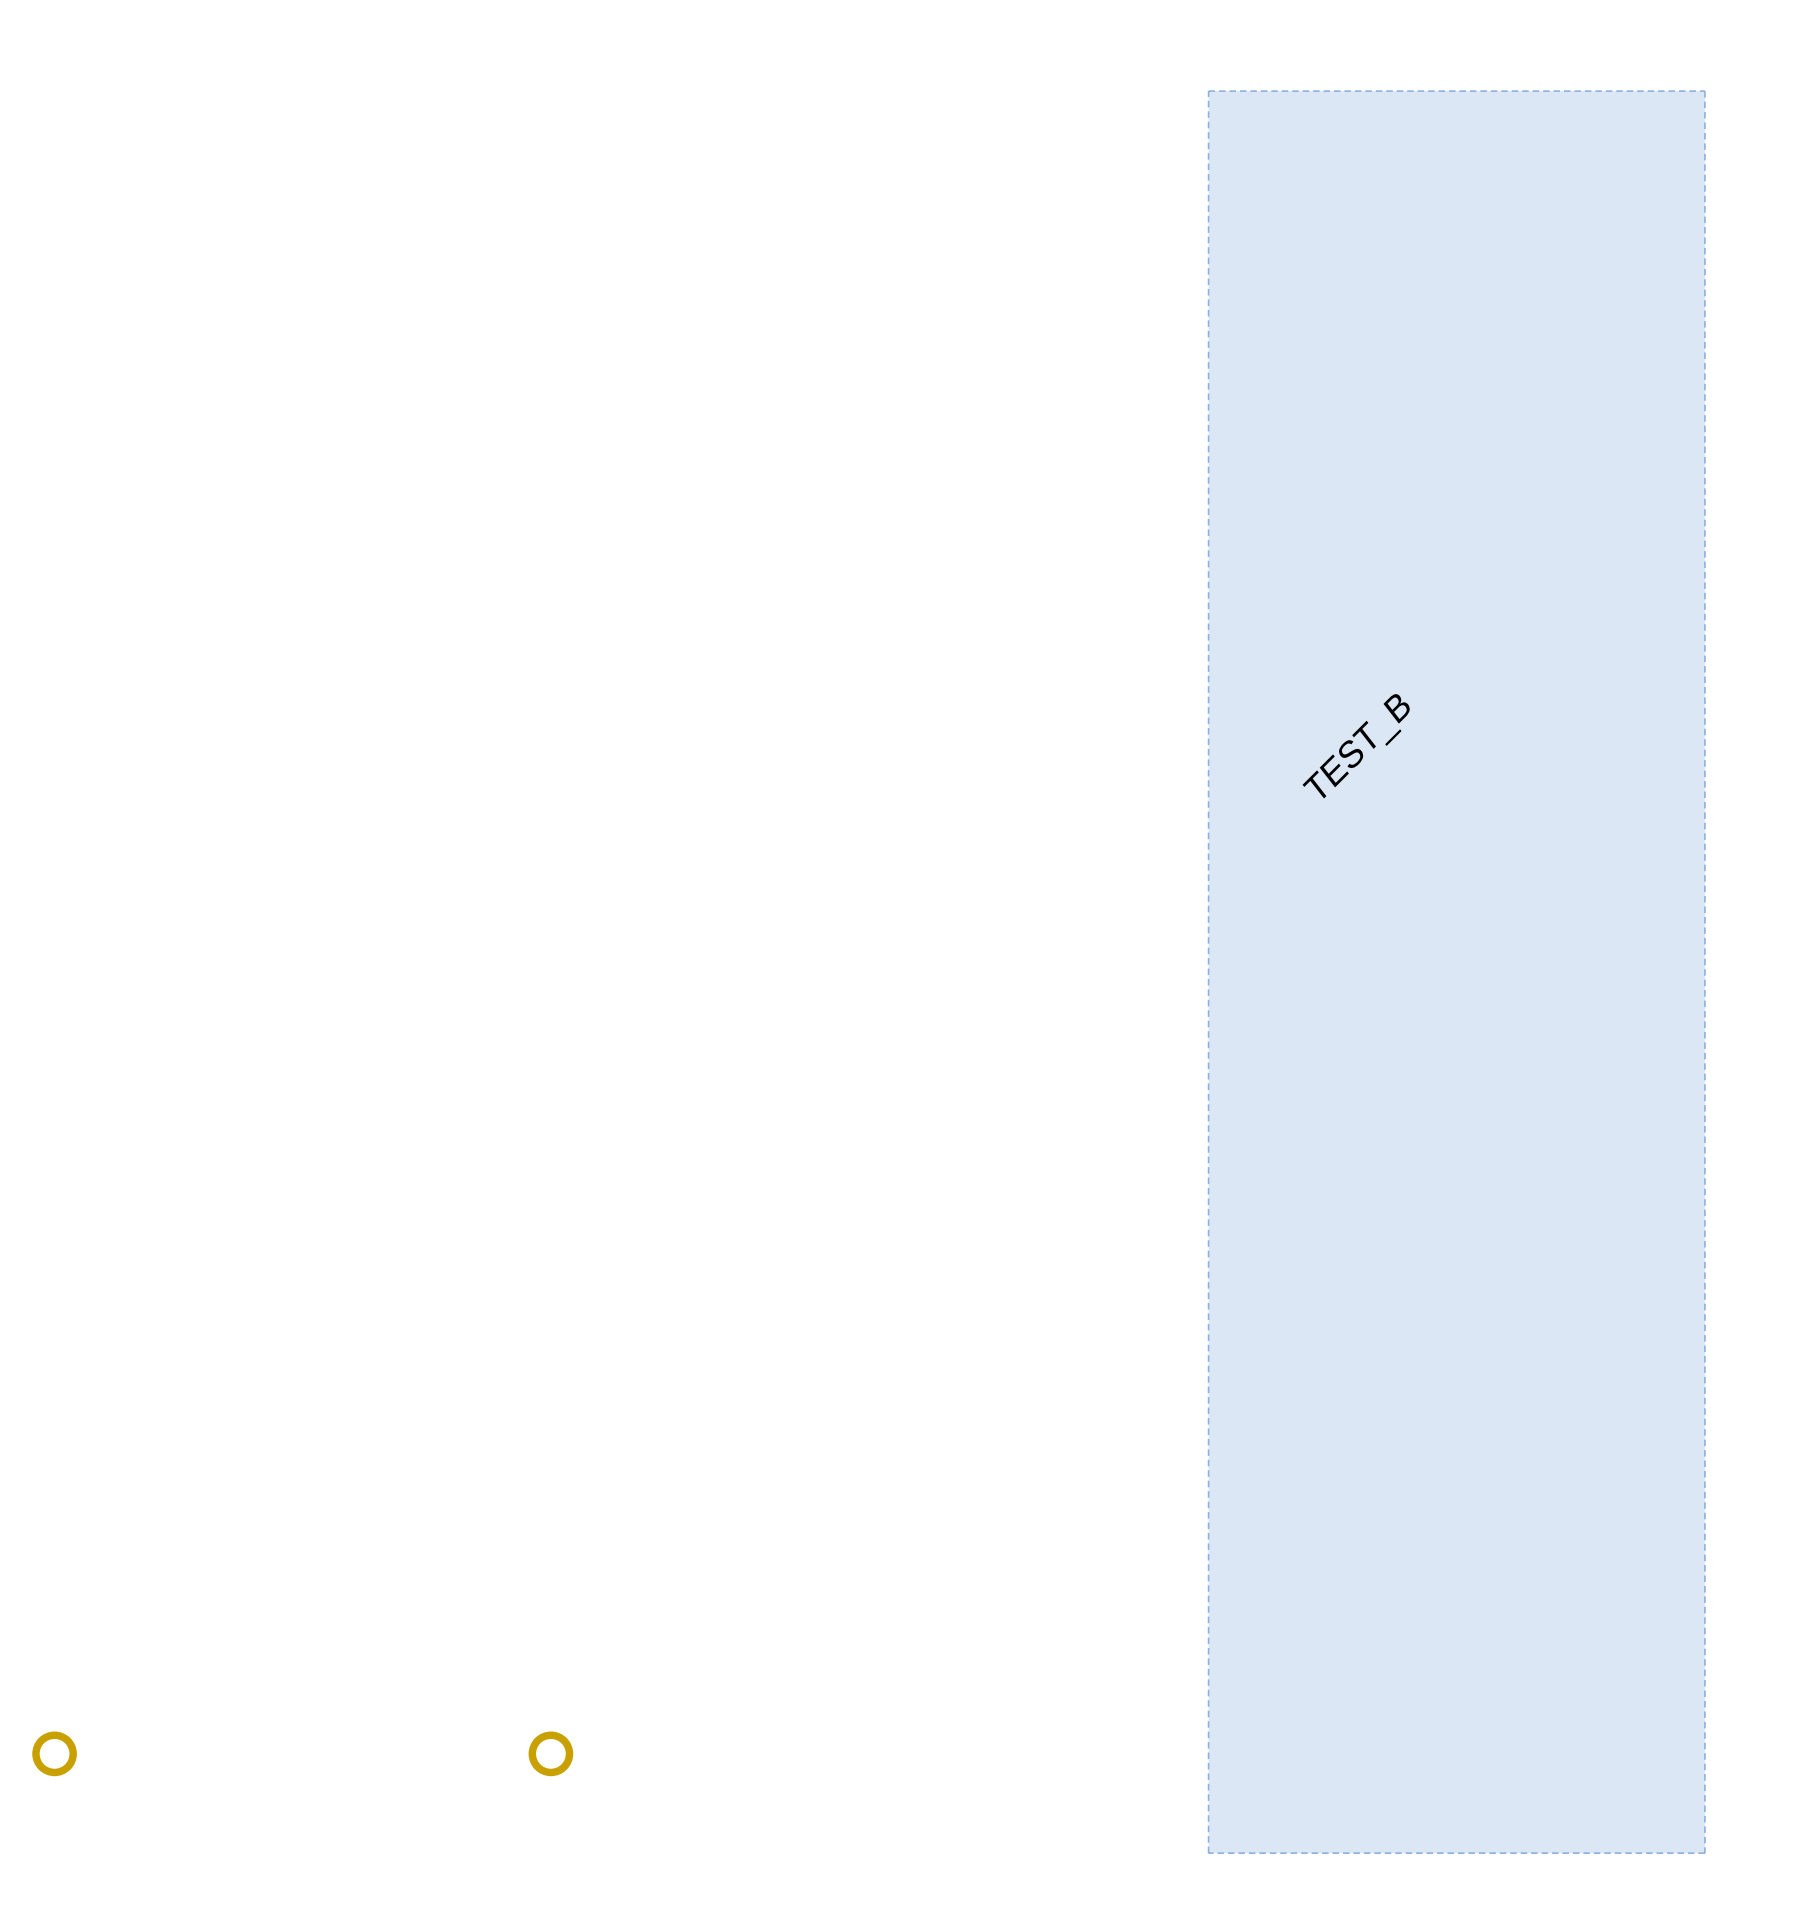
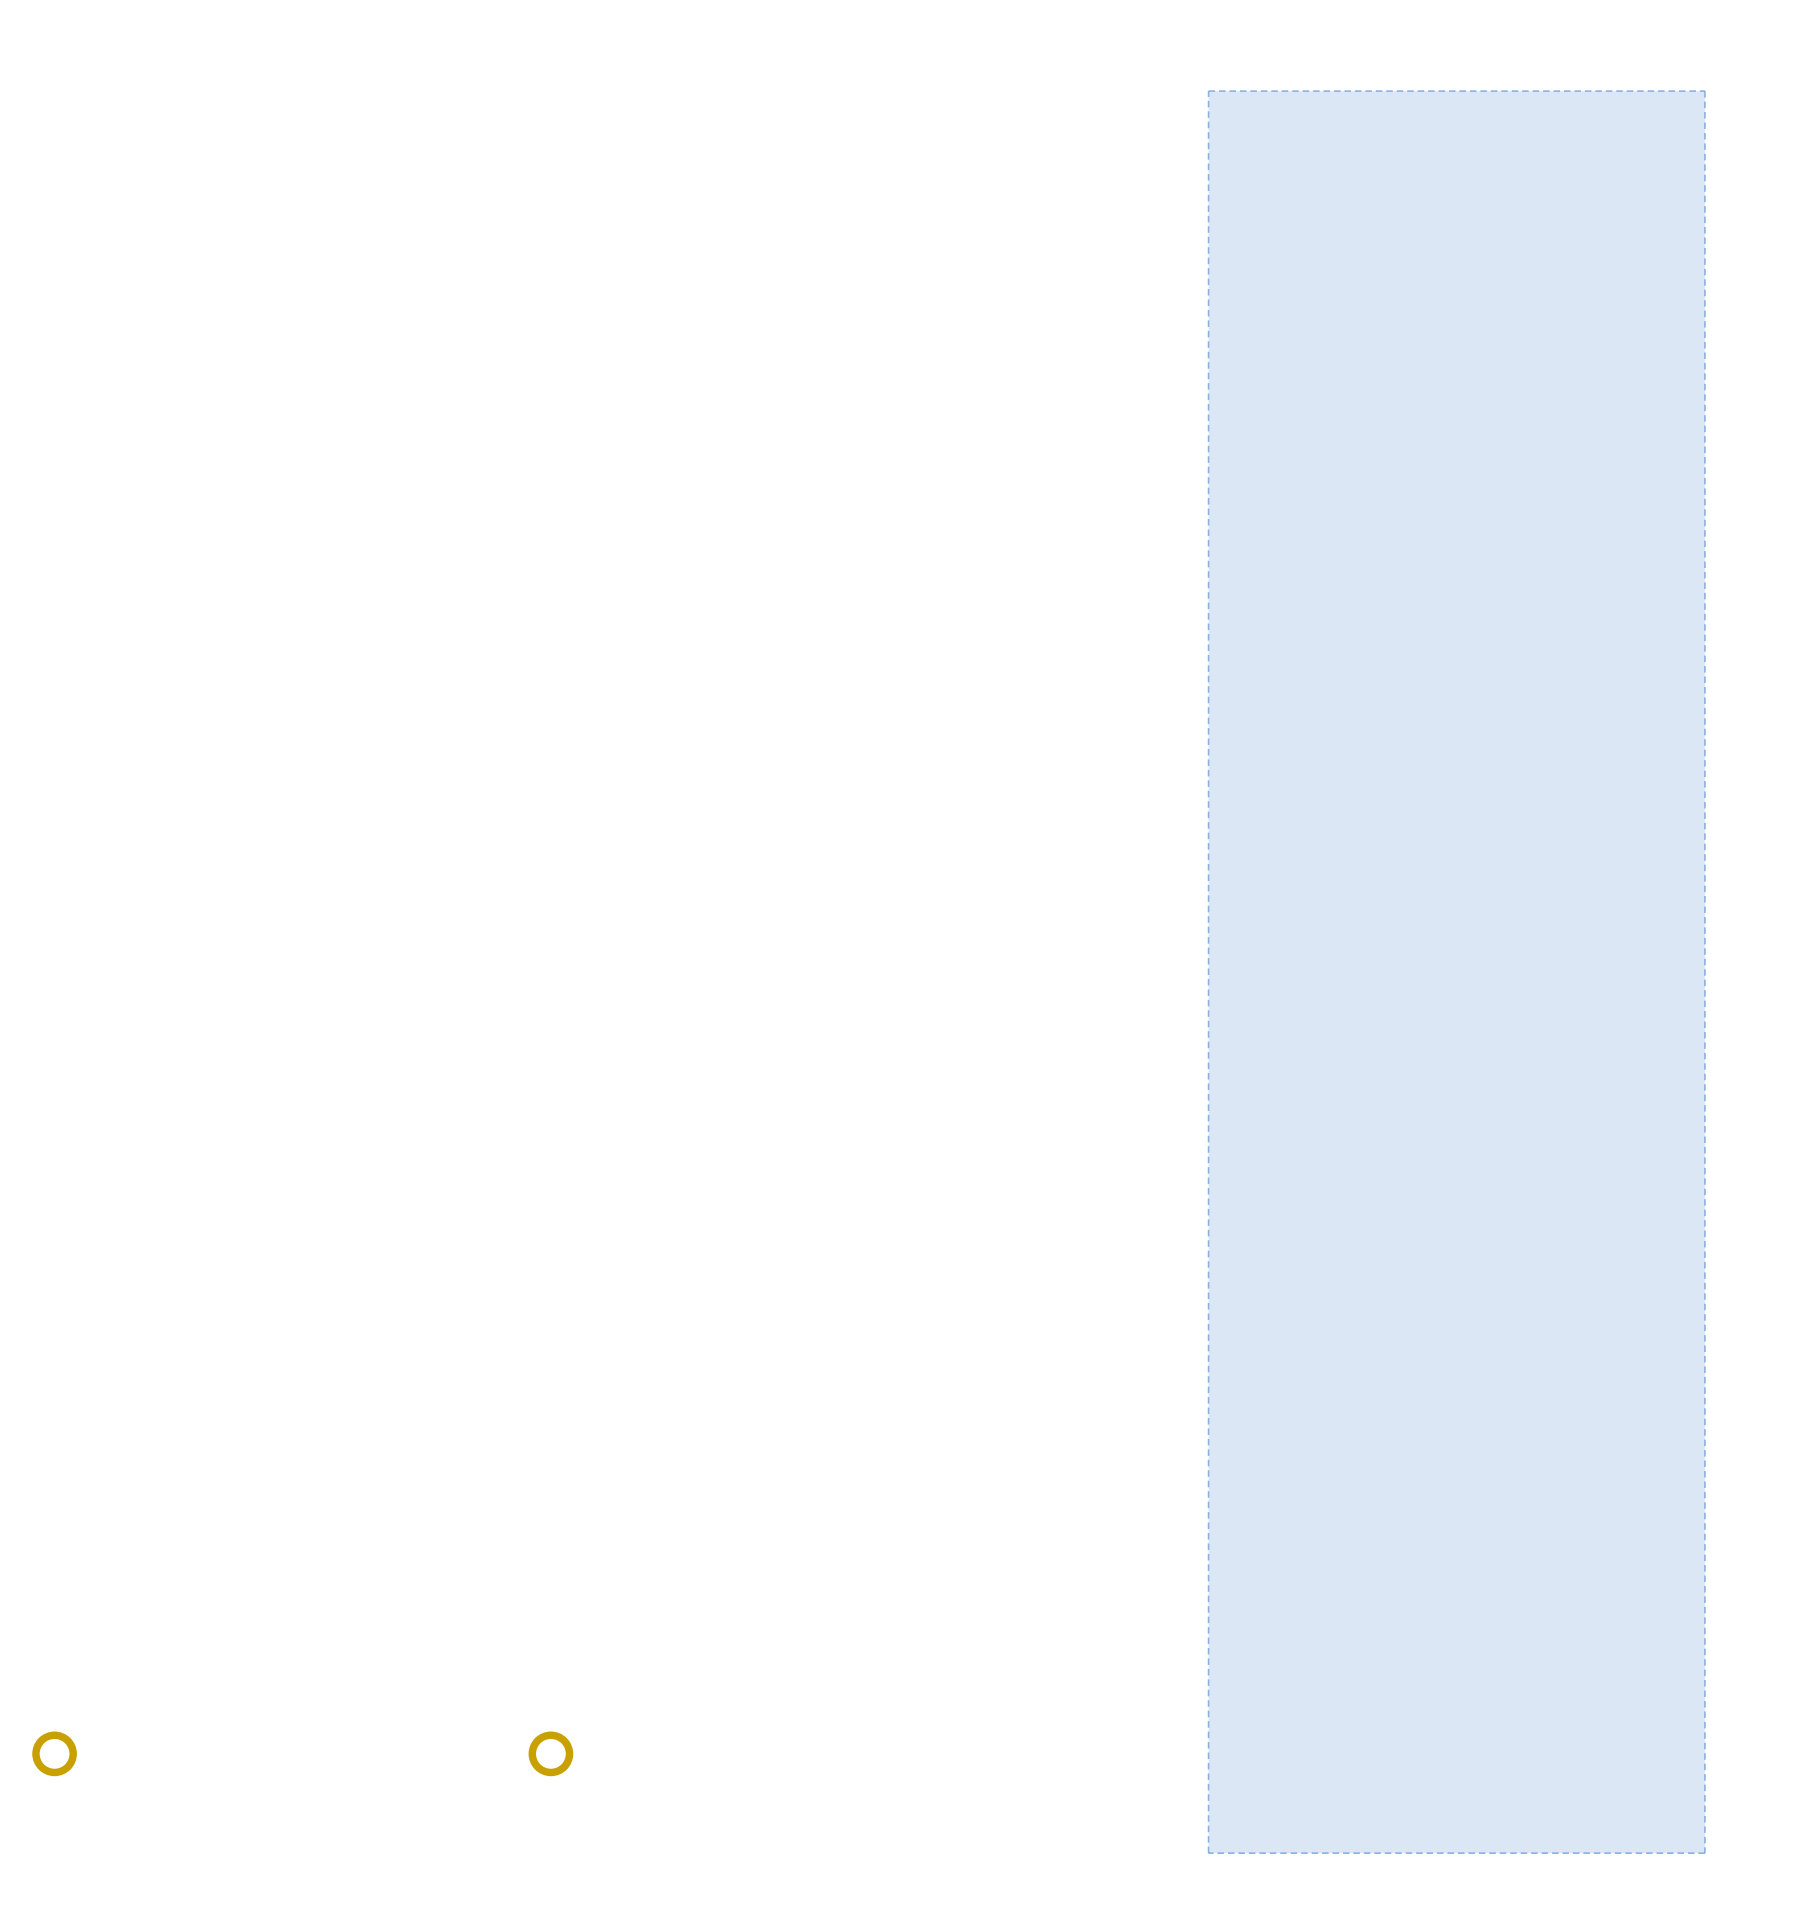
text: TEST_B (1356, 744) -> none

